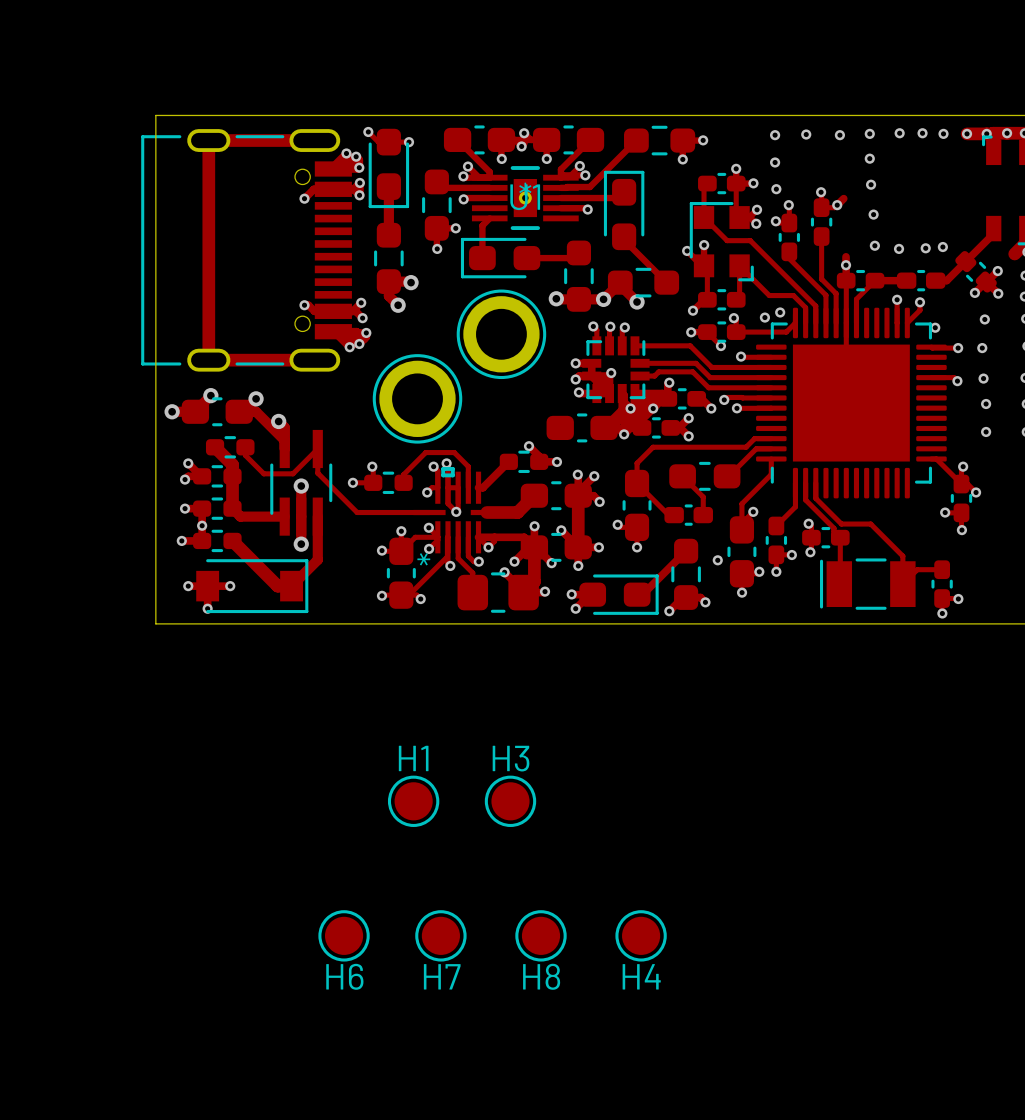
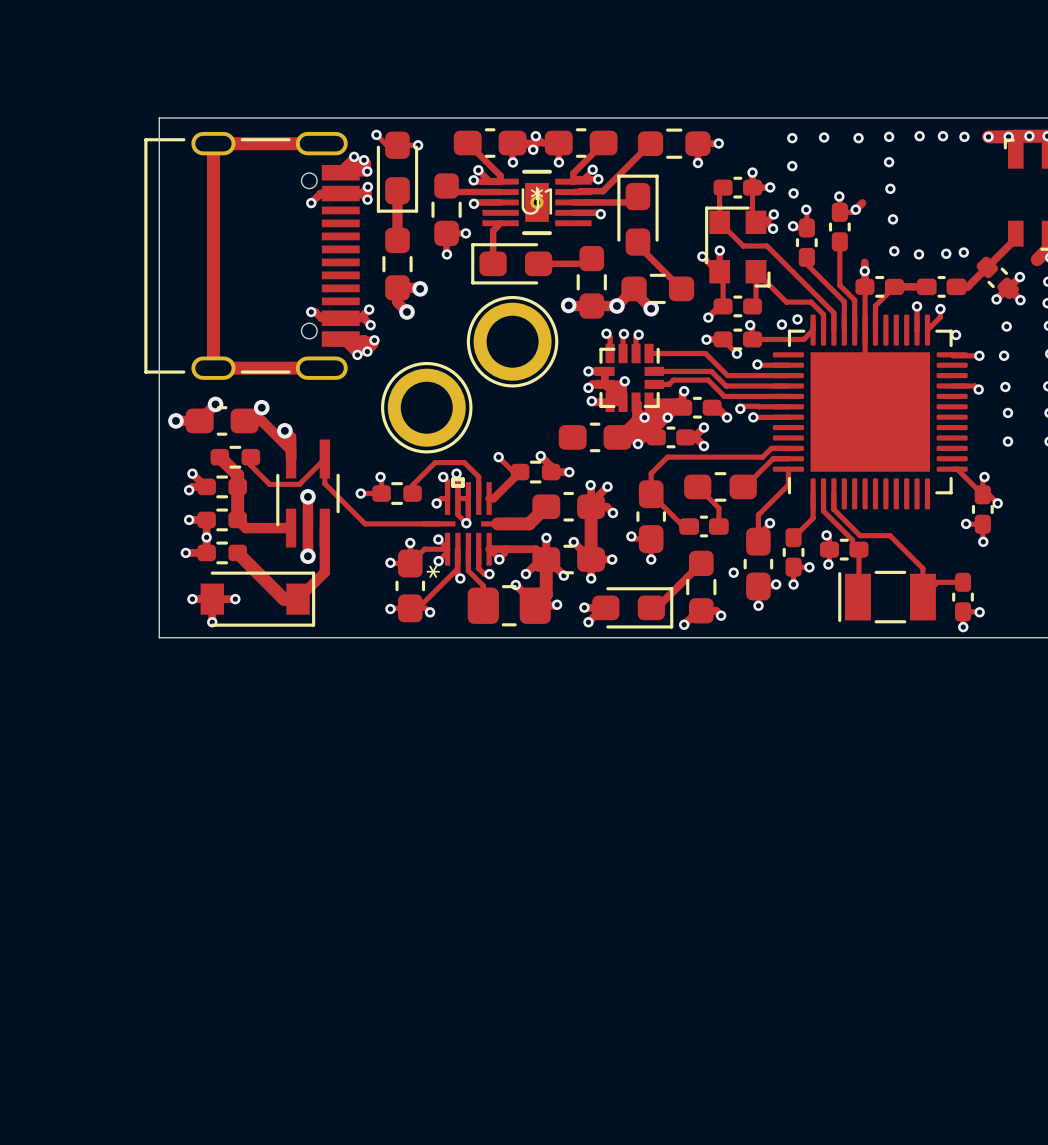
track: none -> (498, 457) (513, 472) (520, 472)
via: none -> (498, 457)
H1: (413, 801) -> none
H3: (510, 801) -> none
H6: (344, 935) -> none
H7: (440, 935) -> none
H8: (541, 935) -> none
H4: (641, 935) -> none

